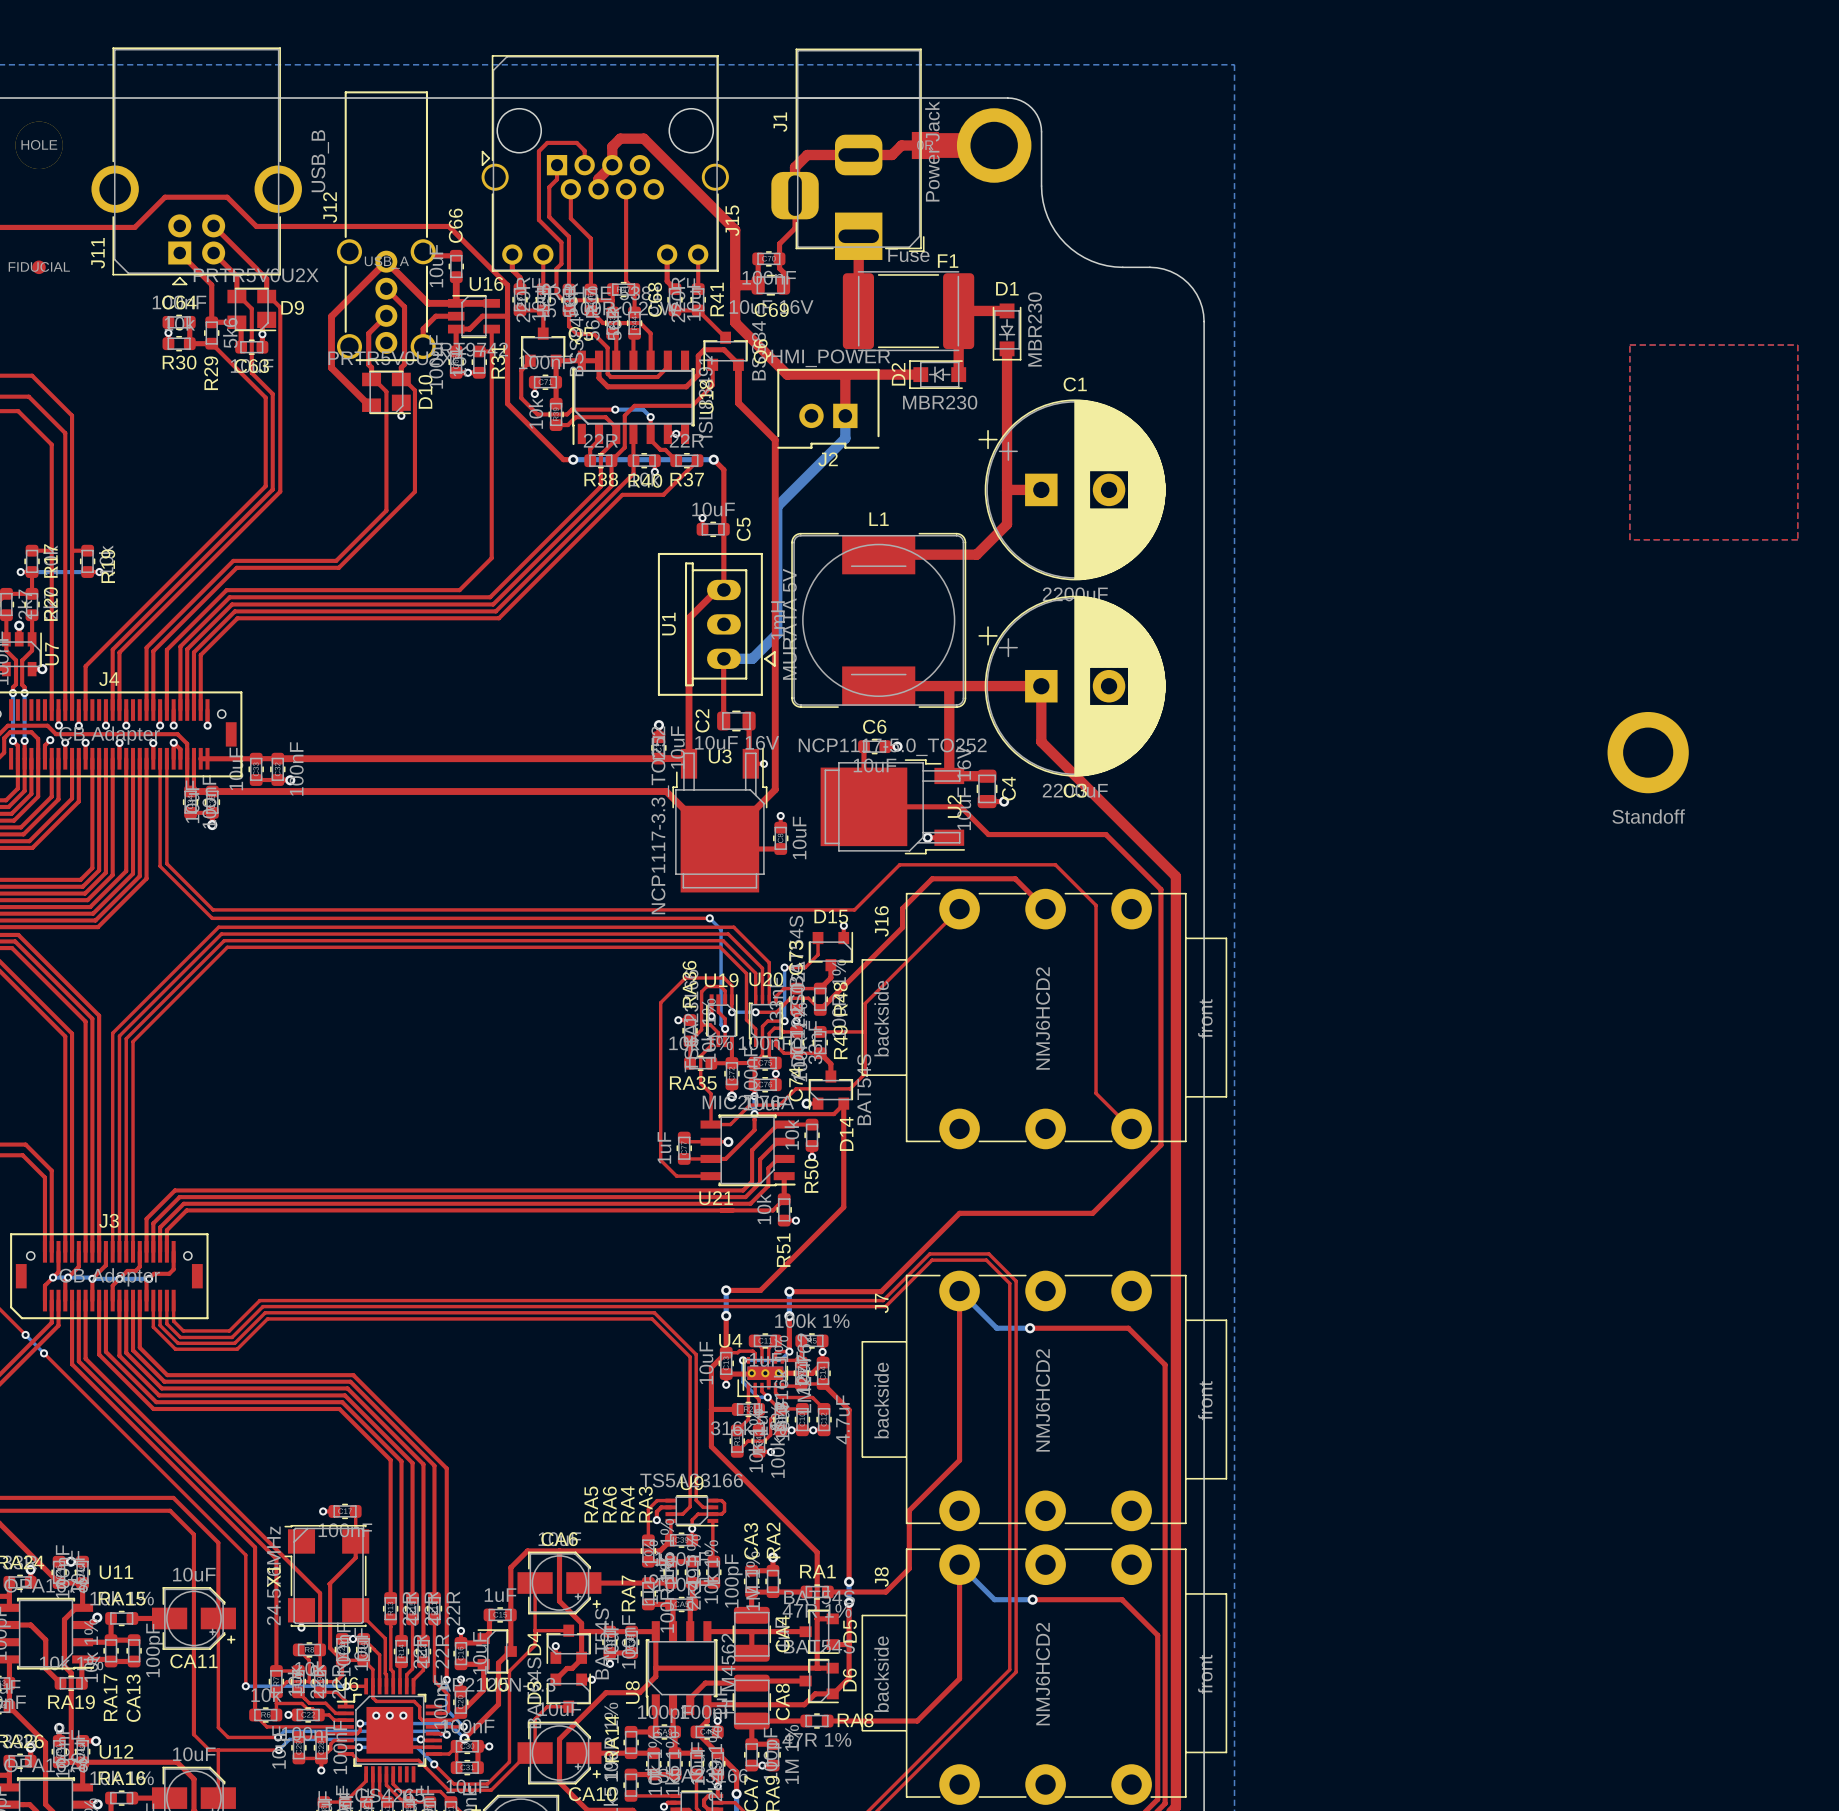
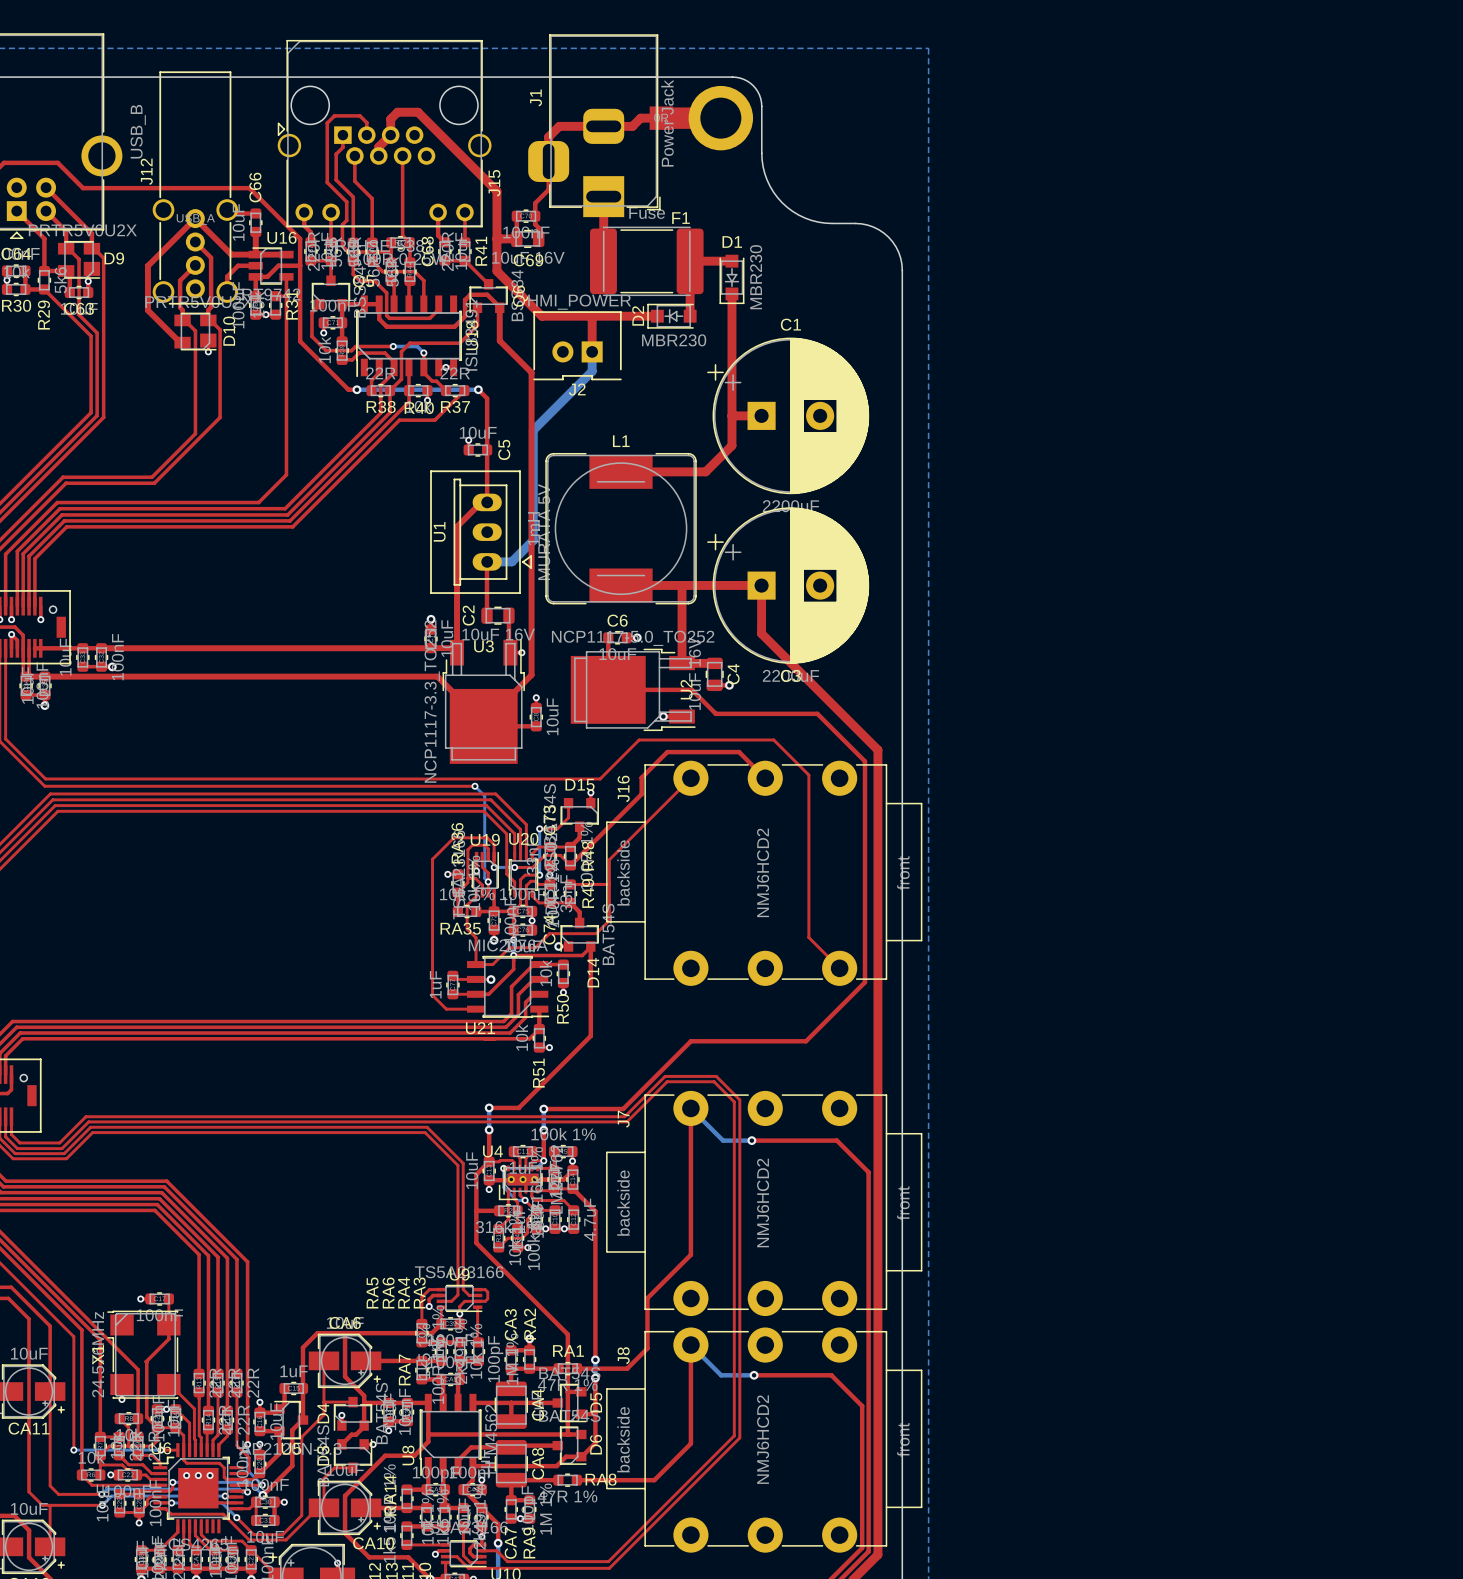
top zone outline: (1629, 345) (1629, 539) (1797, 539) (1797, 345) (1629, 345) -> none
part: Standoff (1648, 752) -> none

